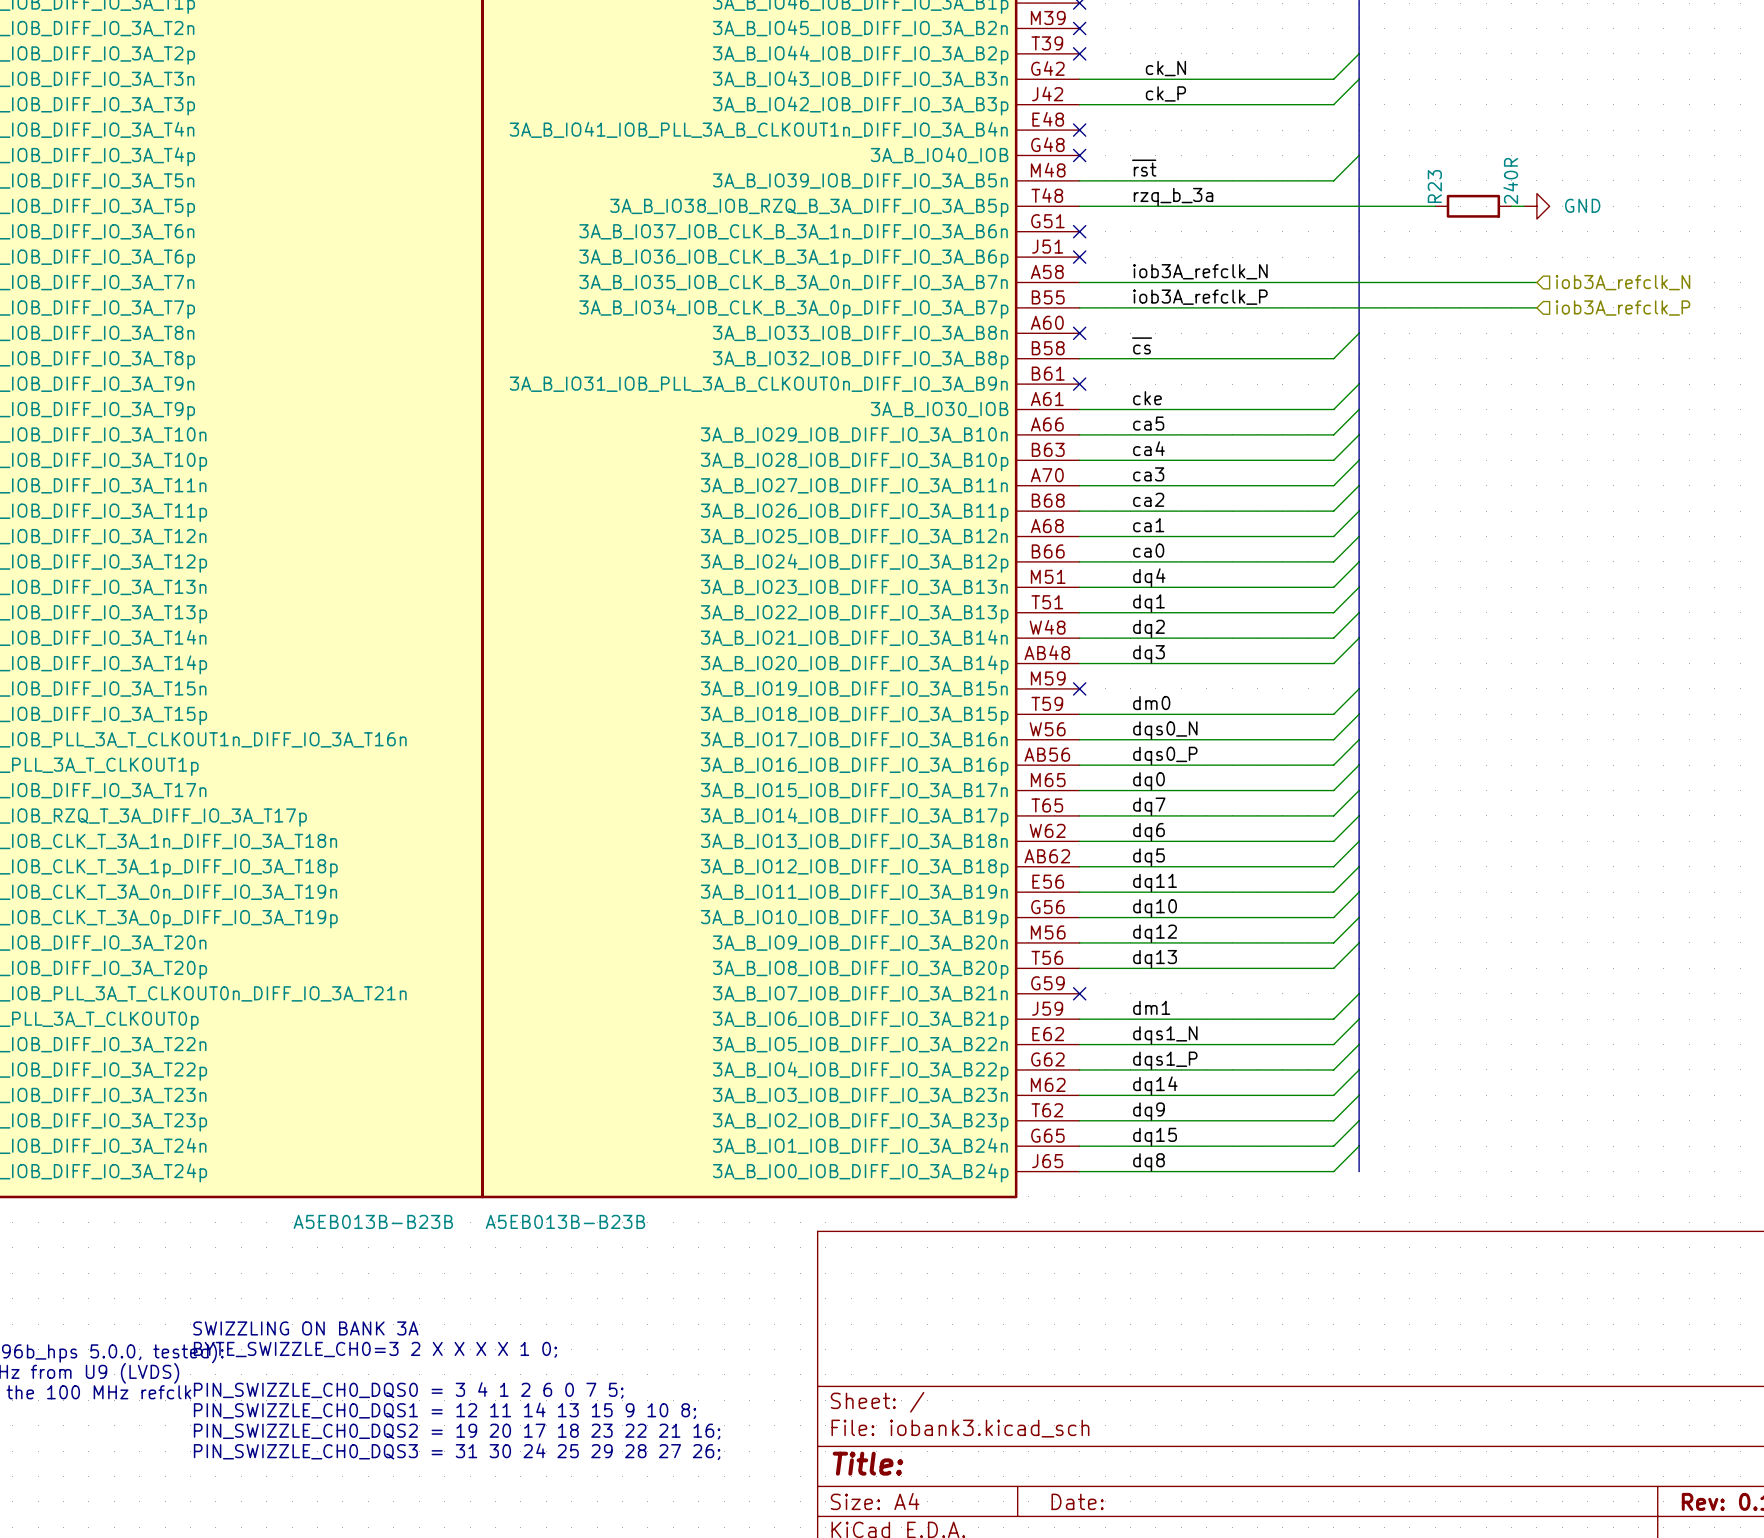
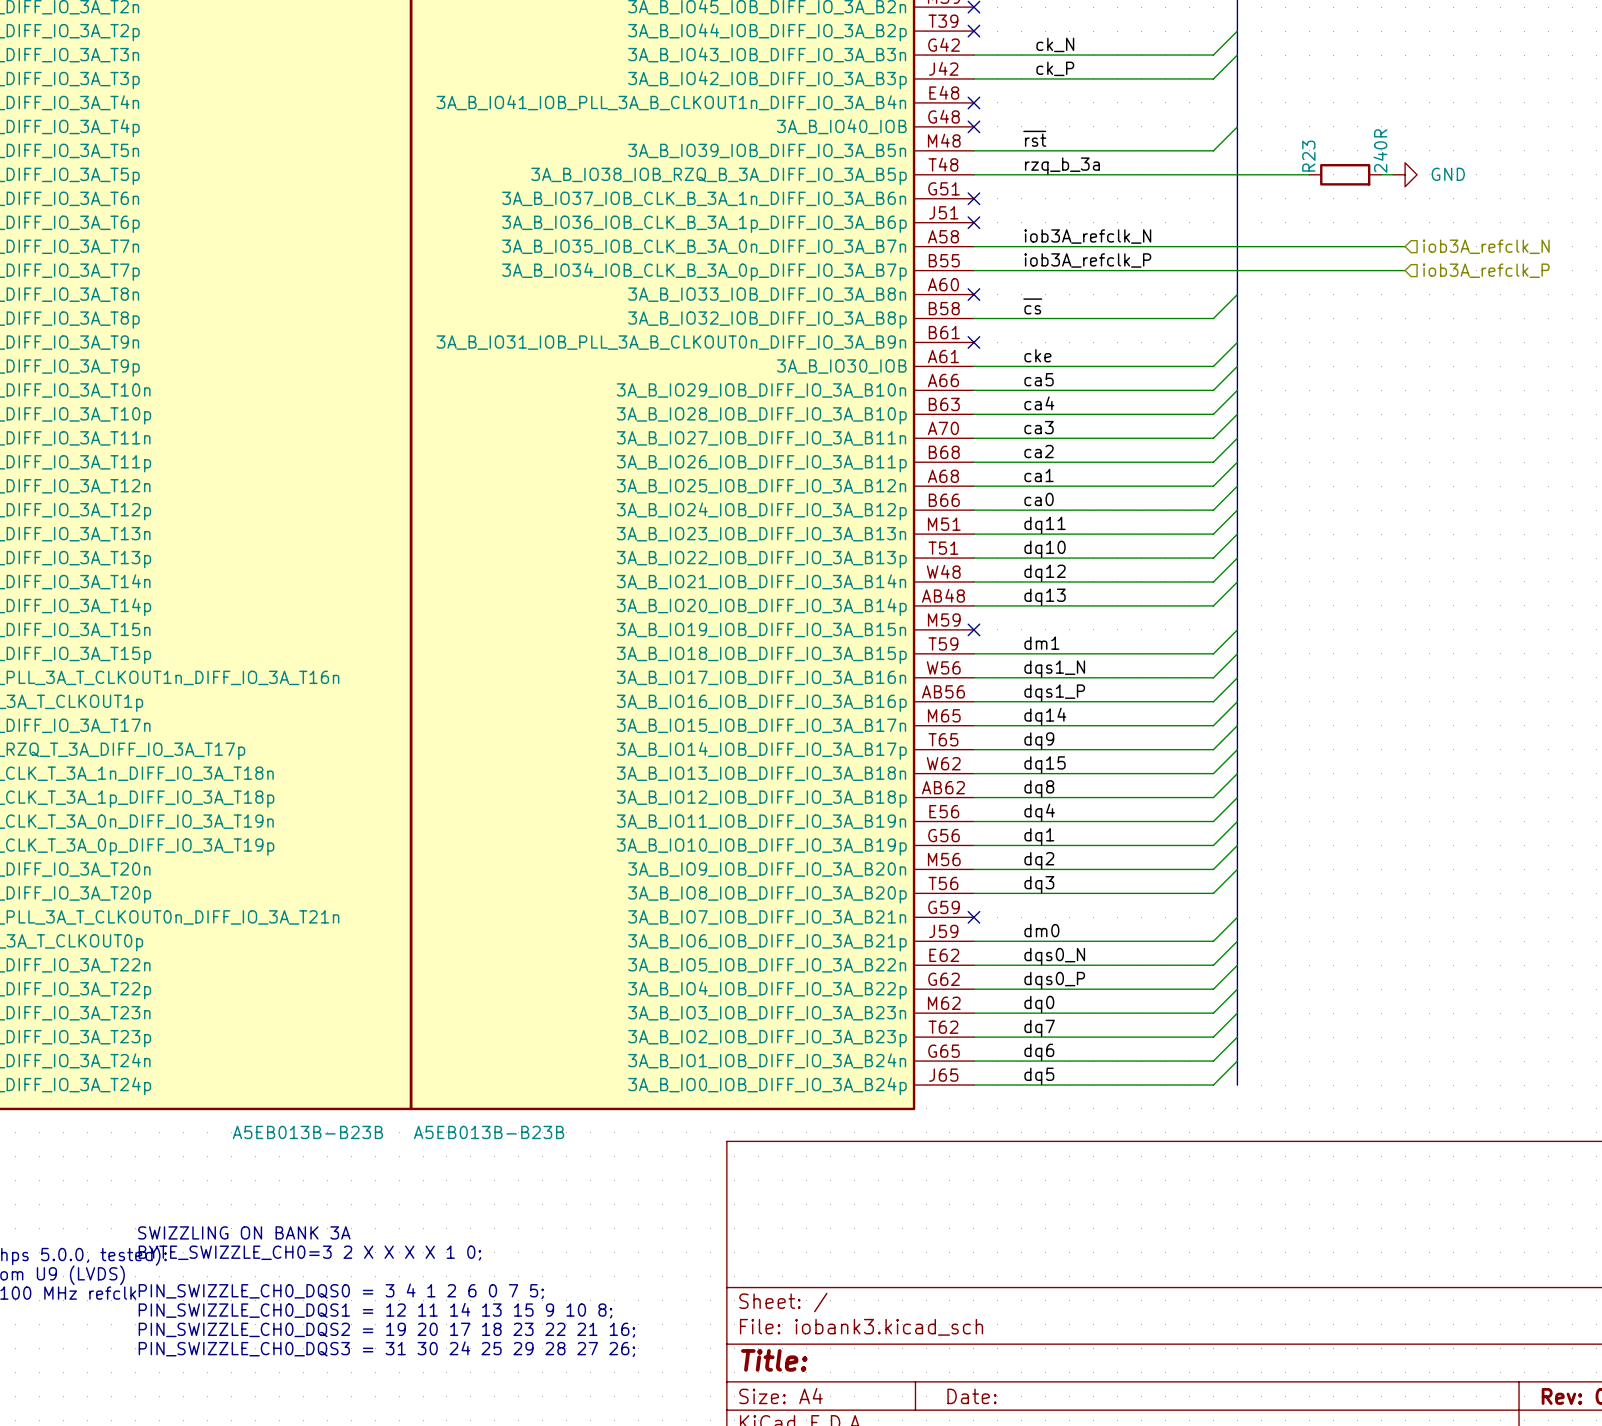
label: dq4 (1149, 577) -> dq11 (1045, 525)
label: dq1 (1149, 603) -> dq10 (1045, 549)
label: dq2 (1149, 628) -> dq12 (1045, 573)
label: dq3 (1149, 654) -> dq13 (1045, 597)
label: dm0 (1151, 703) -> dm1 (1041, 643)
label: dqs0_N (1165, 730) -> dqs1_N (1054, 669)
label: dqs0_P (1165, 755) -> dqs1_P (1054, 693)
label: dq0 (1149, 781) -> dq14 (1045, 716)
label: dq7 (1149, 806) -> dq9 (1039, 740)
label: dq6 (1149, 832) -> dq15 (1045, 764)
label: dq5 (1149, 857) -> dq8 (1039, 788)
label: dq11 (1155, 882) -> dq4 (1039, 812)
label: dq10 (1155, 908) -> dq1 (1039, 836)
label: dq12 (1155, 933) -> dq2 (1039, 860)
label: dq13 (1155, 959) -> dq3 (1039, 884)
label: dm1 (1151, 1007) -> dm0 (1041, 930)
label: dqs1_N (1165, 1035) -> dqs0_N (1054, 956)
label: dqs1_P (1165, 1060) -> dqs0_P (1054, 980)
label: dq14 (1155, 1085) -> dq0 (1039, 1004)
label: dq9 (1149, 1111) -> dq7 (1039, 1028)
label: dq15 (1155, 1136) -> dq6 (1039, 1052)
label: dq8 (1149, 1162) -> dq5 (1039, 1076)

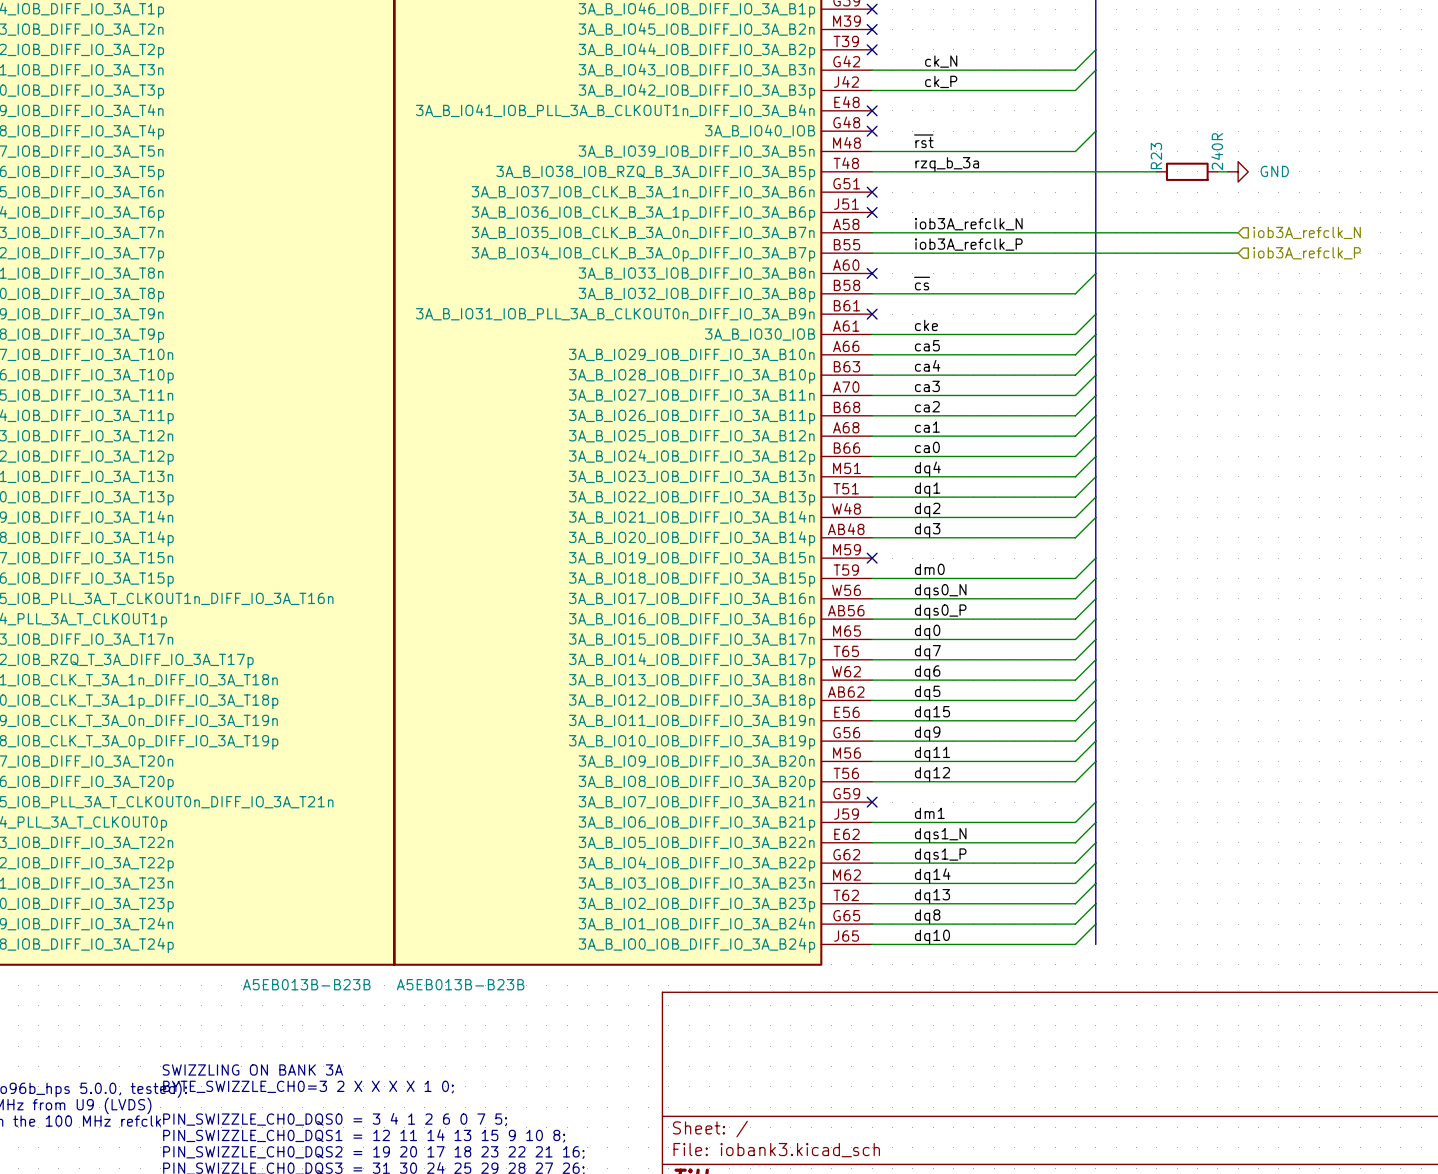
label: dq11 (1045, 525) -> dq4 (927, 469)
label: dq10 (1045, 549) -> dq1 (927, 489)
label: dq12 (1045, 573) -> dq2 (927, 510)
label: dq13 (1045, 597) -> dq3 (927, 530)
label: dm1 (1041, 643) -> dm0 (929, 569)
label: dqs1_N (1054, 669) -> dqs0_N (940, 591)
label: dqs1_P (1054, 693) -> dqs0_P (940, 611)
label: dq14 (1045, 716) -> dq0 (927, 632)
label: dq9 (1039, 740) -> dq7 (927, 652)
label: dq15 (1045, 764) -> dq6 (927, 672)
label: dq8 (1039, 788) -> dq5 (927, 693)
label: dq4 (1039, 812) -> dq15 (932, 713)
label: dq1 (1039, 836) -> dq9 (927, 733)
label: dq2 (1039, 860) -> dq11 (932, 754)
label: dq3 (1039, 884) -> dq12 (932, 774)
label: dm0 (1041, 930) -> dm1 (929, 813)
label: dqs0_N (1054, 956) -> dqs1_N (940, 835)
label: dqs0_P (1054, 980) -> dqs1_P (940, 855)
label: dq0 (1039, 1004) -> dq14 (932, 875)
label: dq7 (1039, 1028) -> dq13 (932, 896)
label: dq6 (1039, 1052) -> dq8 (927, 916)
label: dq5 (1039, 1076) -> dq10 (932, 937)

